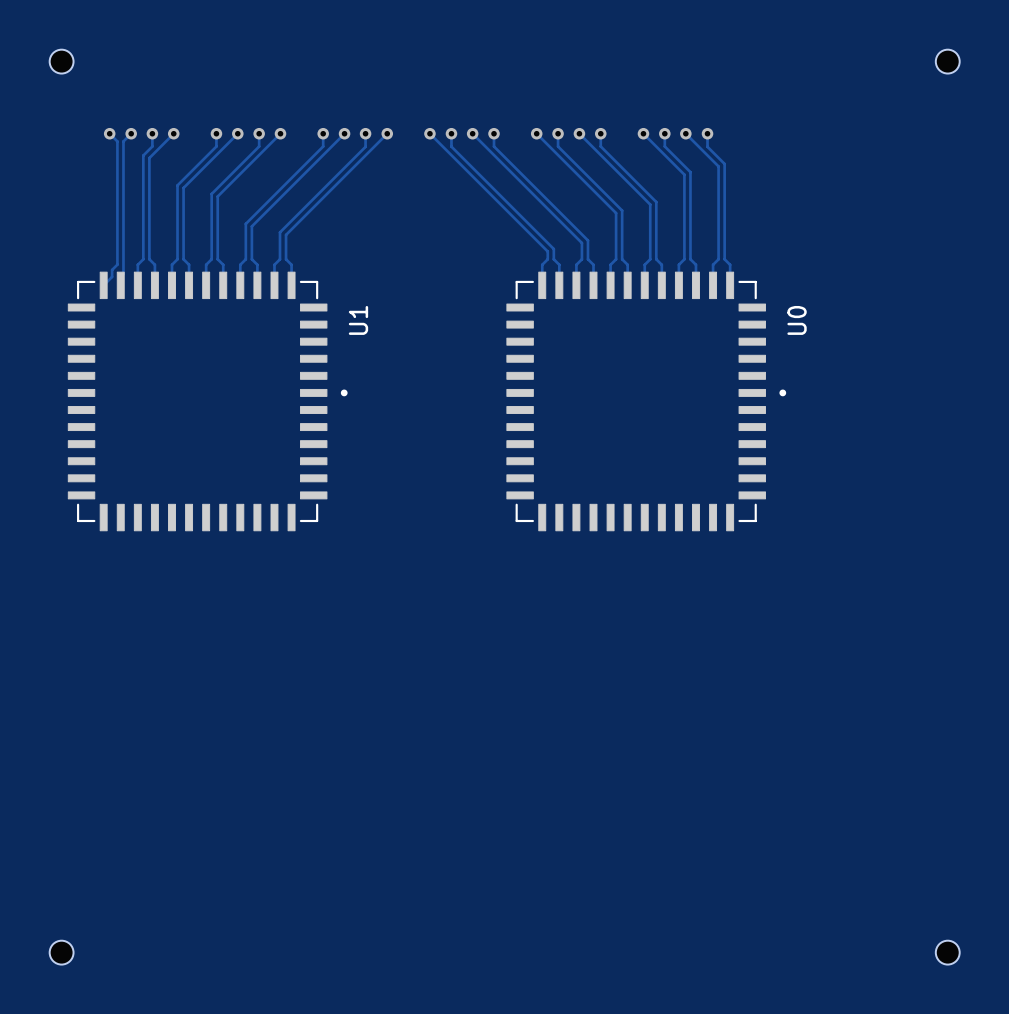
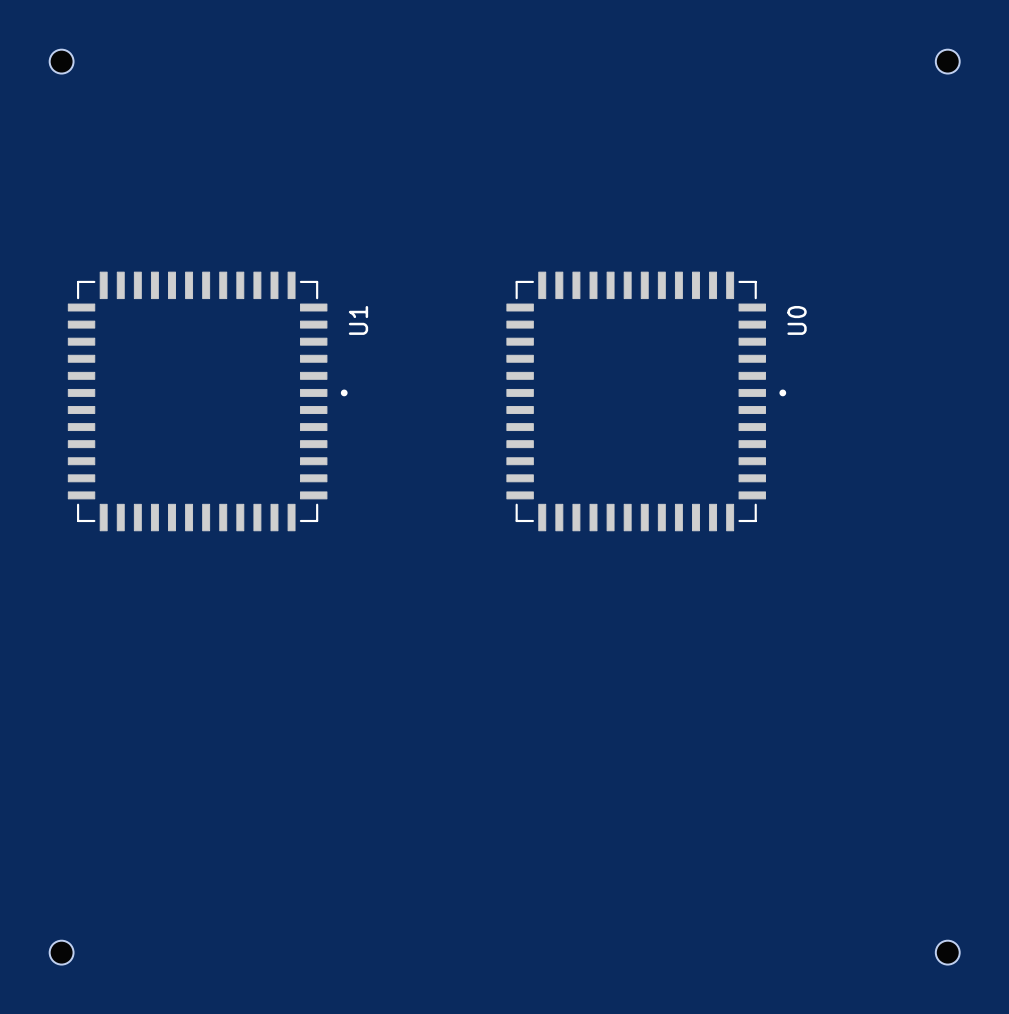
track: (109, 133) (117, 141) (117, 264) (112, 269) (112, 276) (103, 285) -> none
via: (109, 133) -> none
track: (131, 133) (123, 141) (123, 274) (120, 276) (120, 285) -> none
via: (131, 133) -> none
track: (152, 133) (152, 146) (143, 155) (143, 259) (137, 264) (137, 285) -> none
via: (152, 133) -> none
track: (173, 133) (149, 158) (149, 259) (154, 264) (154, 285) -> none
via: (173, 133) -> none
track: (216, 133) (216, 146) (177, 185) (177, 259) (171, 264) (171, 285) -> none
via: (216, 133) -> none
track: (237, 133) (183, 187) (183, 259) (189, 264) (189, 285) -> none
via: (237, 133) -> none
track: (259, 133) (259, 146) (211, 194) (211, 259) (206, 264) (206, 285) -> none
via: (259, 133) -> none
track: (280, 133) (217, 196) (217, 259) (223, 264) (223, 285) -> none
via: (280, 133) -> none
track: (323, 133) (323, 146) (245, 223) (245, 259) (240, 264) (240, 285) -> none
via: (323, 133) -> none
track: (344, 133) (251, 226) (251, 259) (257, 264) (257, 285) -> none
via: (344, 133) -> none
track: (365, 133) (365, 146) (279, 232) (279, 259) (274, 264) (274, 285) -> none
via: (365, 133) -> none
track: (387, 133) (286, 234) (286, 259) (291, 264) (291, 285) -> none
via: (387, 133) -> none
track: (429, 133) (547, 251) (547, 259) (542, 264) (542, 285) -> none
via: (429, 133) -> none
track: (451, 133) (451, 146) (553, 249) (553, 259) (559, 264) (559, 285) -> none
via: (451, 133) -> none
track: (472, 133) (581, 243) (581, 259) (576, 264) (576, 285) -> none
via: (472, 133) -> none
track: (494, 133) (494, 146) (587, 240) (587, 259) (593, 264) (593, 285) -> none
via: (494, 133) -> none
track: (536, 133) (616, 213) (616, 259) (610, 264) (610, 285) -> none
via: (536, 133) -> none
track: (558, 133) (558, 146) (622, 210) (622, 259) (627, 264) (627, 285) -> none
via: (558, 133) -> none
track: (579, 133) (650, 204) (650, 259) (644, 264) (644, 285) -> none
via: (579, 133) -> none
track: (600, 133) (600, 146) (656, 202) (656, 259) (661, 264) (661, 285) -> none
via: (600, 133) -> none
track: (643, 133) (684, 174) (684, 259) (678, 264) (678, 285) -> none
via: (643, 133) -> none
track: (664, 133) (664, 146) (690, 172) (690, 259) (695, 264) (695, 285) -> none
via: (664, 133) -> none
track: (685, 133) (718, 166) (718, 259) (713, 264) (713, 285) -> none
via: (685, 133) -> none
track: (707, 133) (707, 146) (724, 163) (724, 259) (730, 264) (730, 285) -> none
via: (707, 133) -> none

